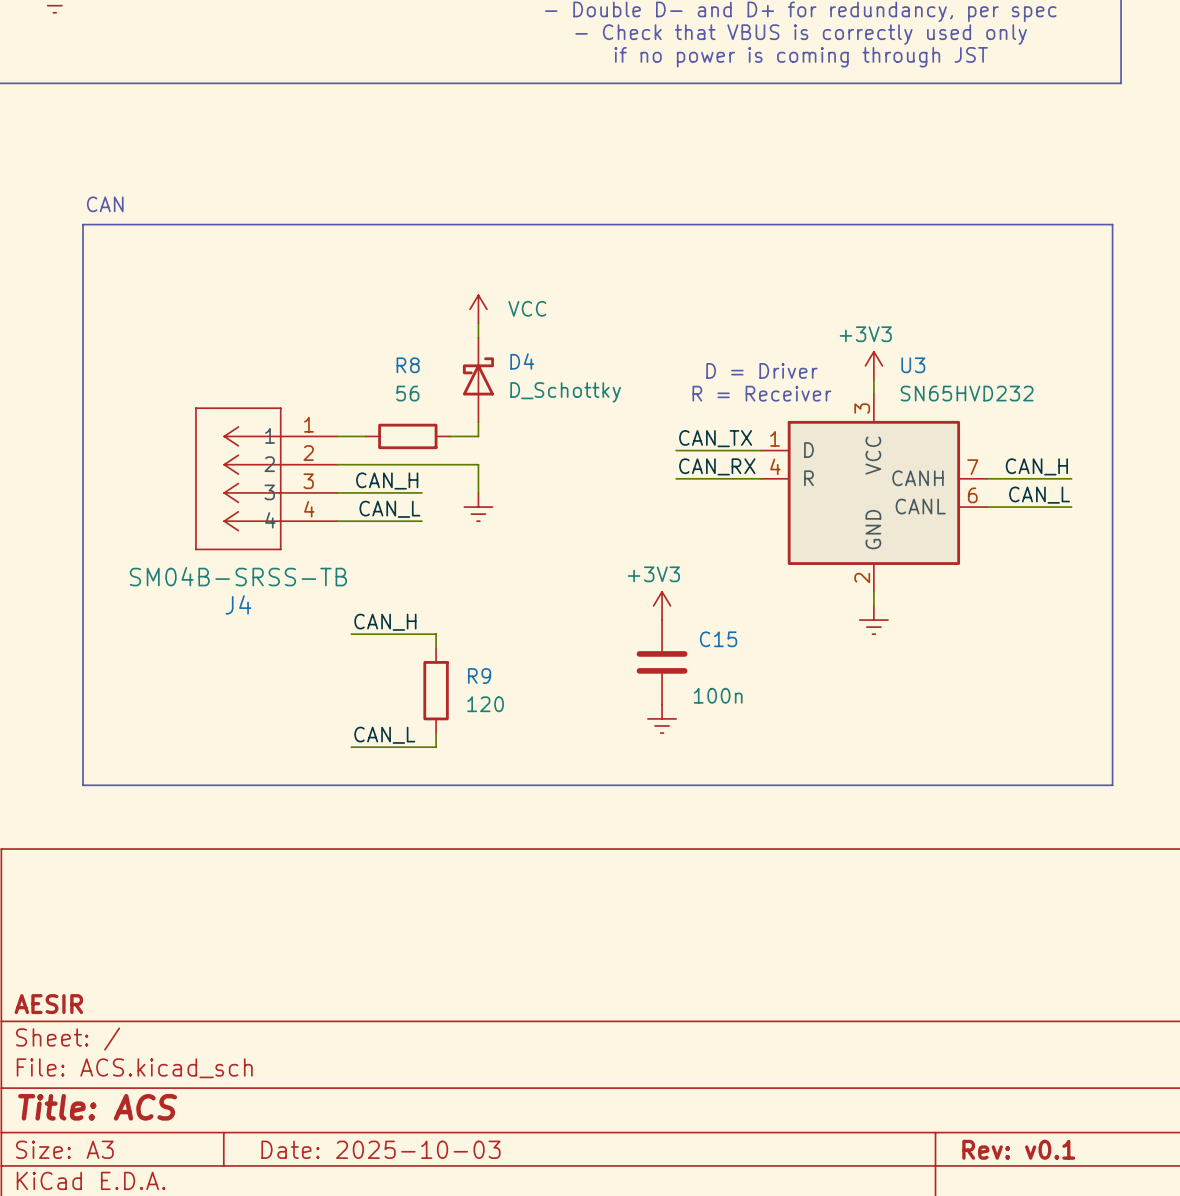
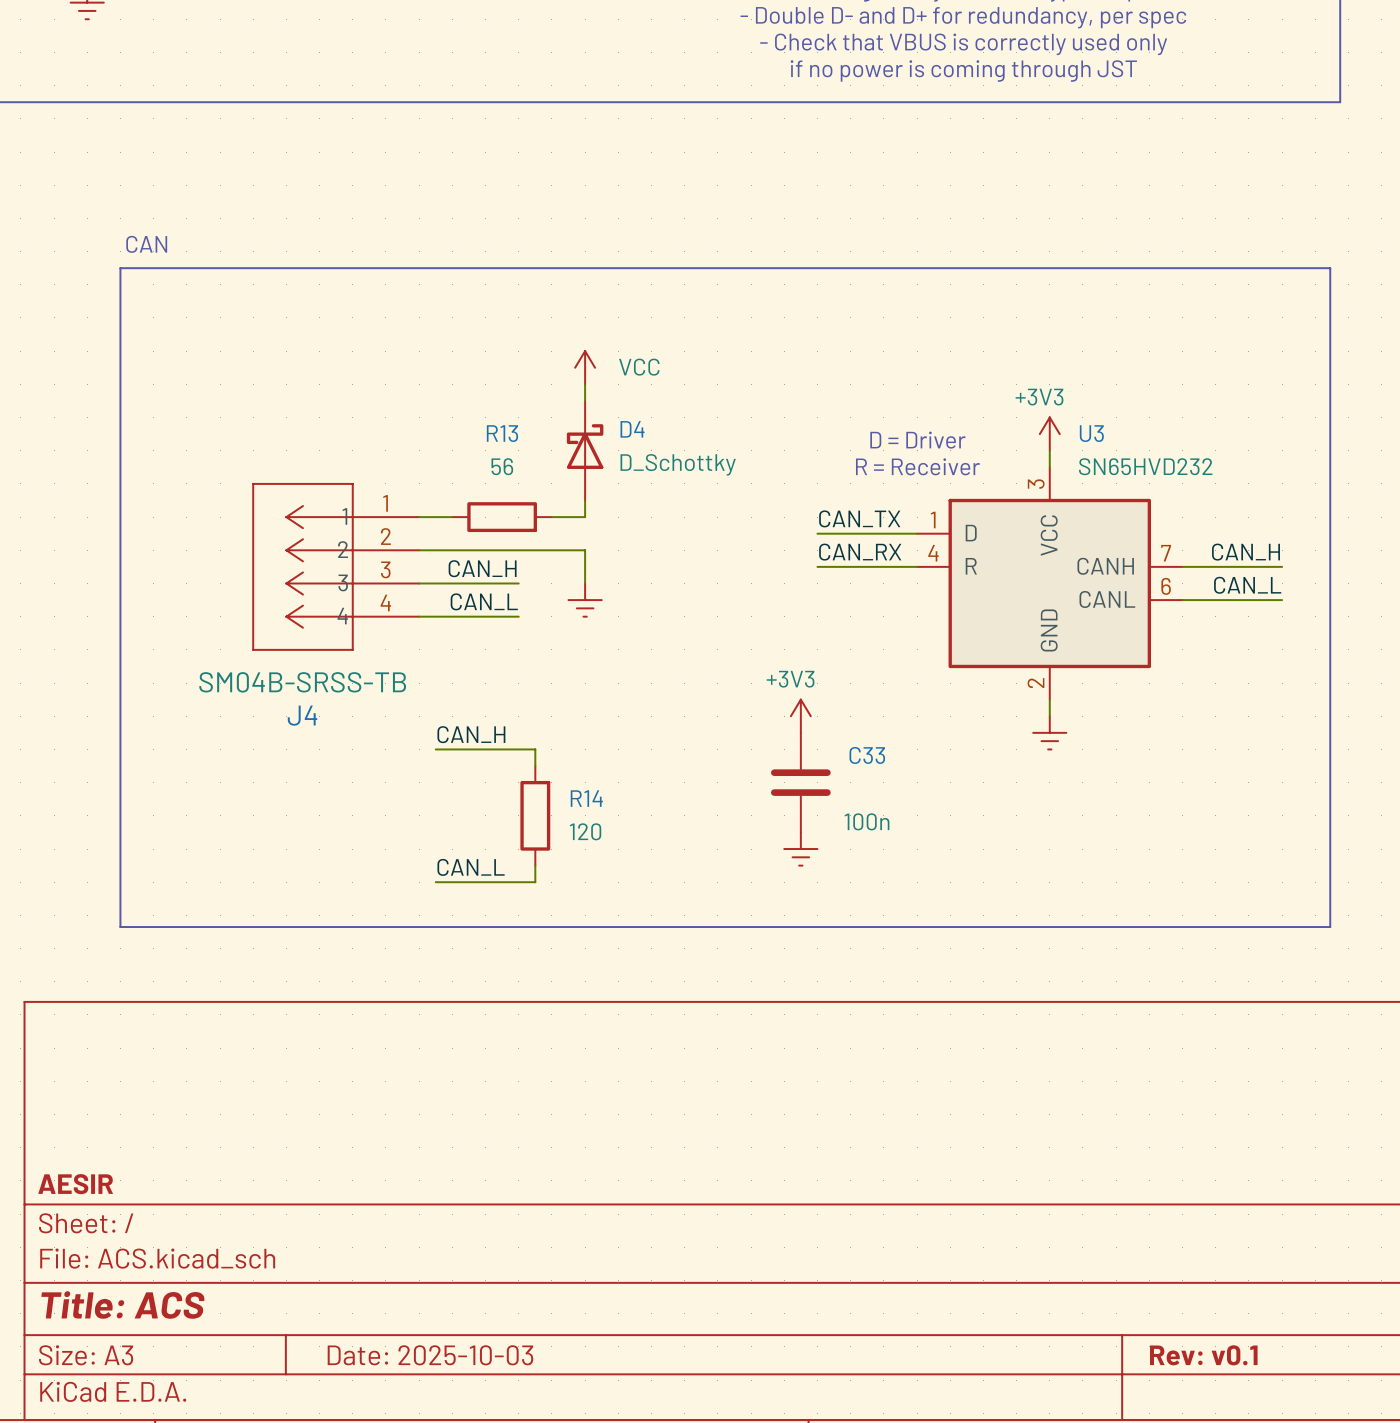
R8 name: R8 (408, 365) -> R13 (502, 433)
C15 name: C15 (718, 639) -> C33 (867, 755)
R9 name: R9 (479, 676) -> R14 (586, 798)

